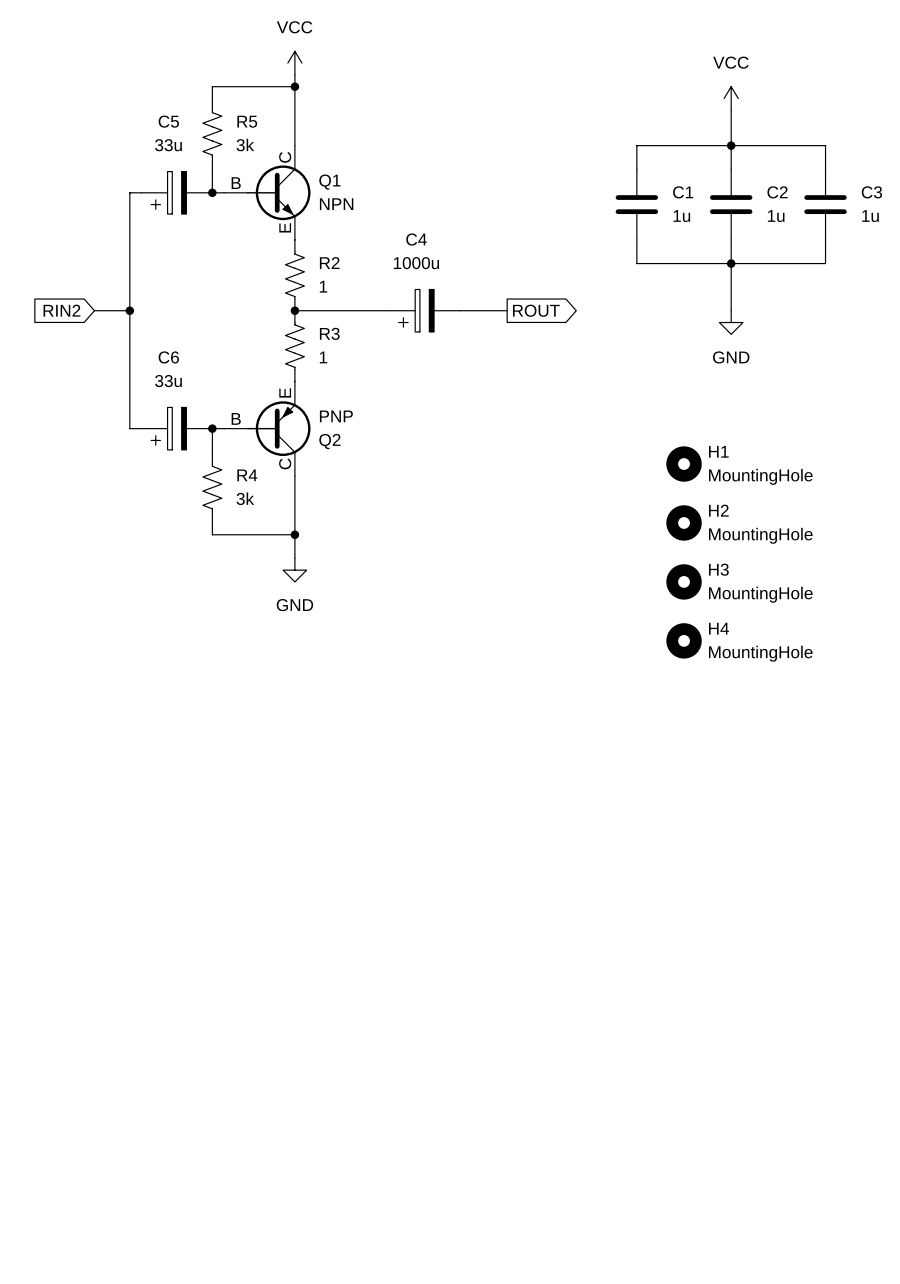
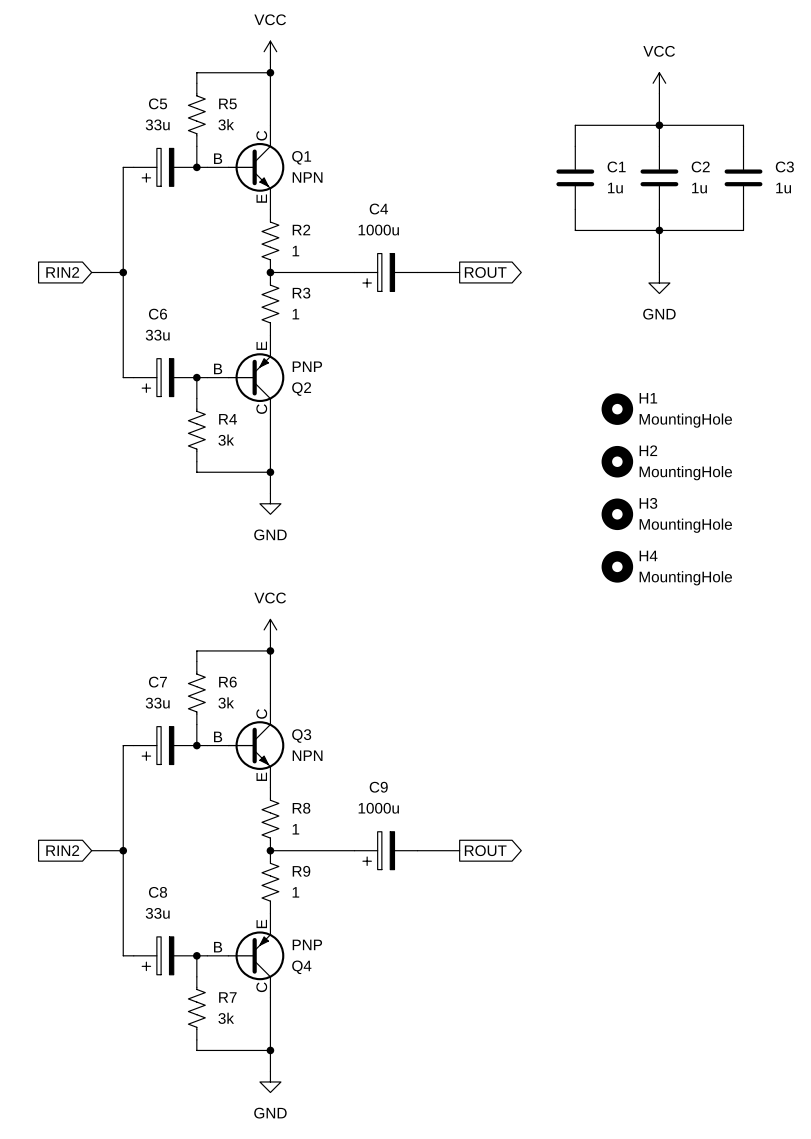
power symbol: none -> VCC (270, 629)
wire: none -> (270, 640) (270, 703)
wire: none -> (270, 650) (196, 650) (196, 661)
junction: none -> (270, 650)
R6: none -> 3k (196, 693)
wire: none -> (196, 724) (196, 745) (207, 745)
wire: none -> (133, 745) (123, 745) (123, 955) (133, 955)
C7: none -> 33u (165, 745)
junction: none -> (196, 745)
Q3: none -> NPN (245, 745)
R8: none -> 1 (270, 819)
global label: none -> RIN2 (62, 850)
wire: none -> (91, 850) (123, 850)
junction: none -> (123, 850)
wire: none -> (270, 850) (354, 850)
junction: none -> (270, 850)
C9: none -> 1000u (386, 850)
wire: none -> (417, 850) (459, 850)
global label: none -> ROUT (485, 850)
R9: none -> 1 (270, 882)
C8: none -> 33u (165, 955)
junction: none -> (196, 955)
wire: none -> (207, 955) (196, 955) (196, 976)
Q4: none -> PNP (245, 955)
wire: none -> (270, 997) (270, 1071)
R7: none -> 3k (196, 1008)
wire: none -> (196, 1039) (196, 1050) (270, 1050)
junction: none -> (270, 1050)
power symbol: none -> GND (270, 1081)

